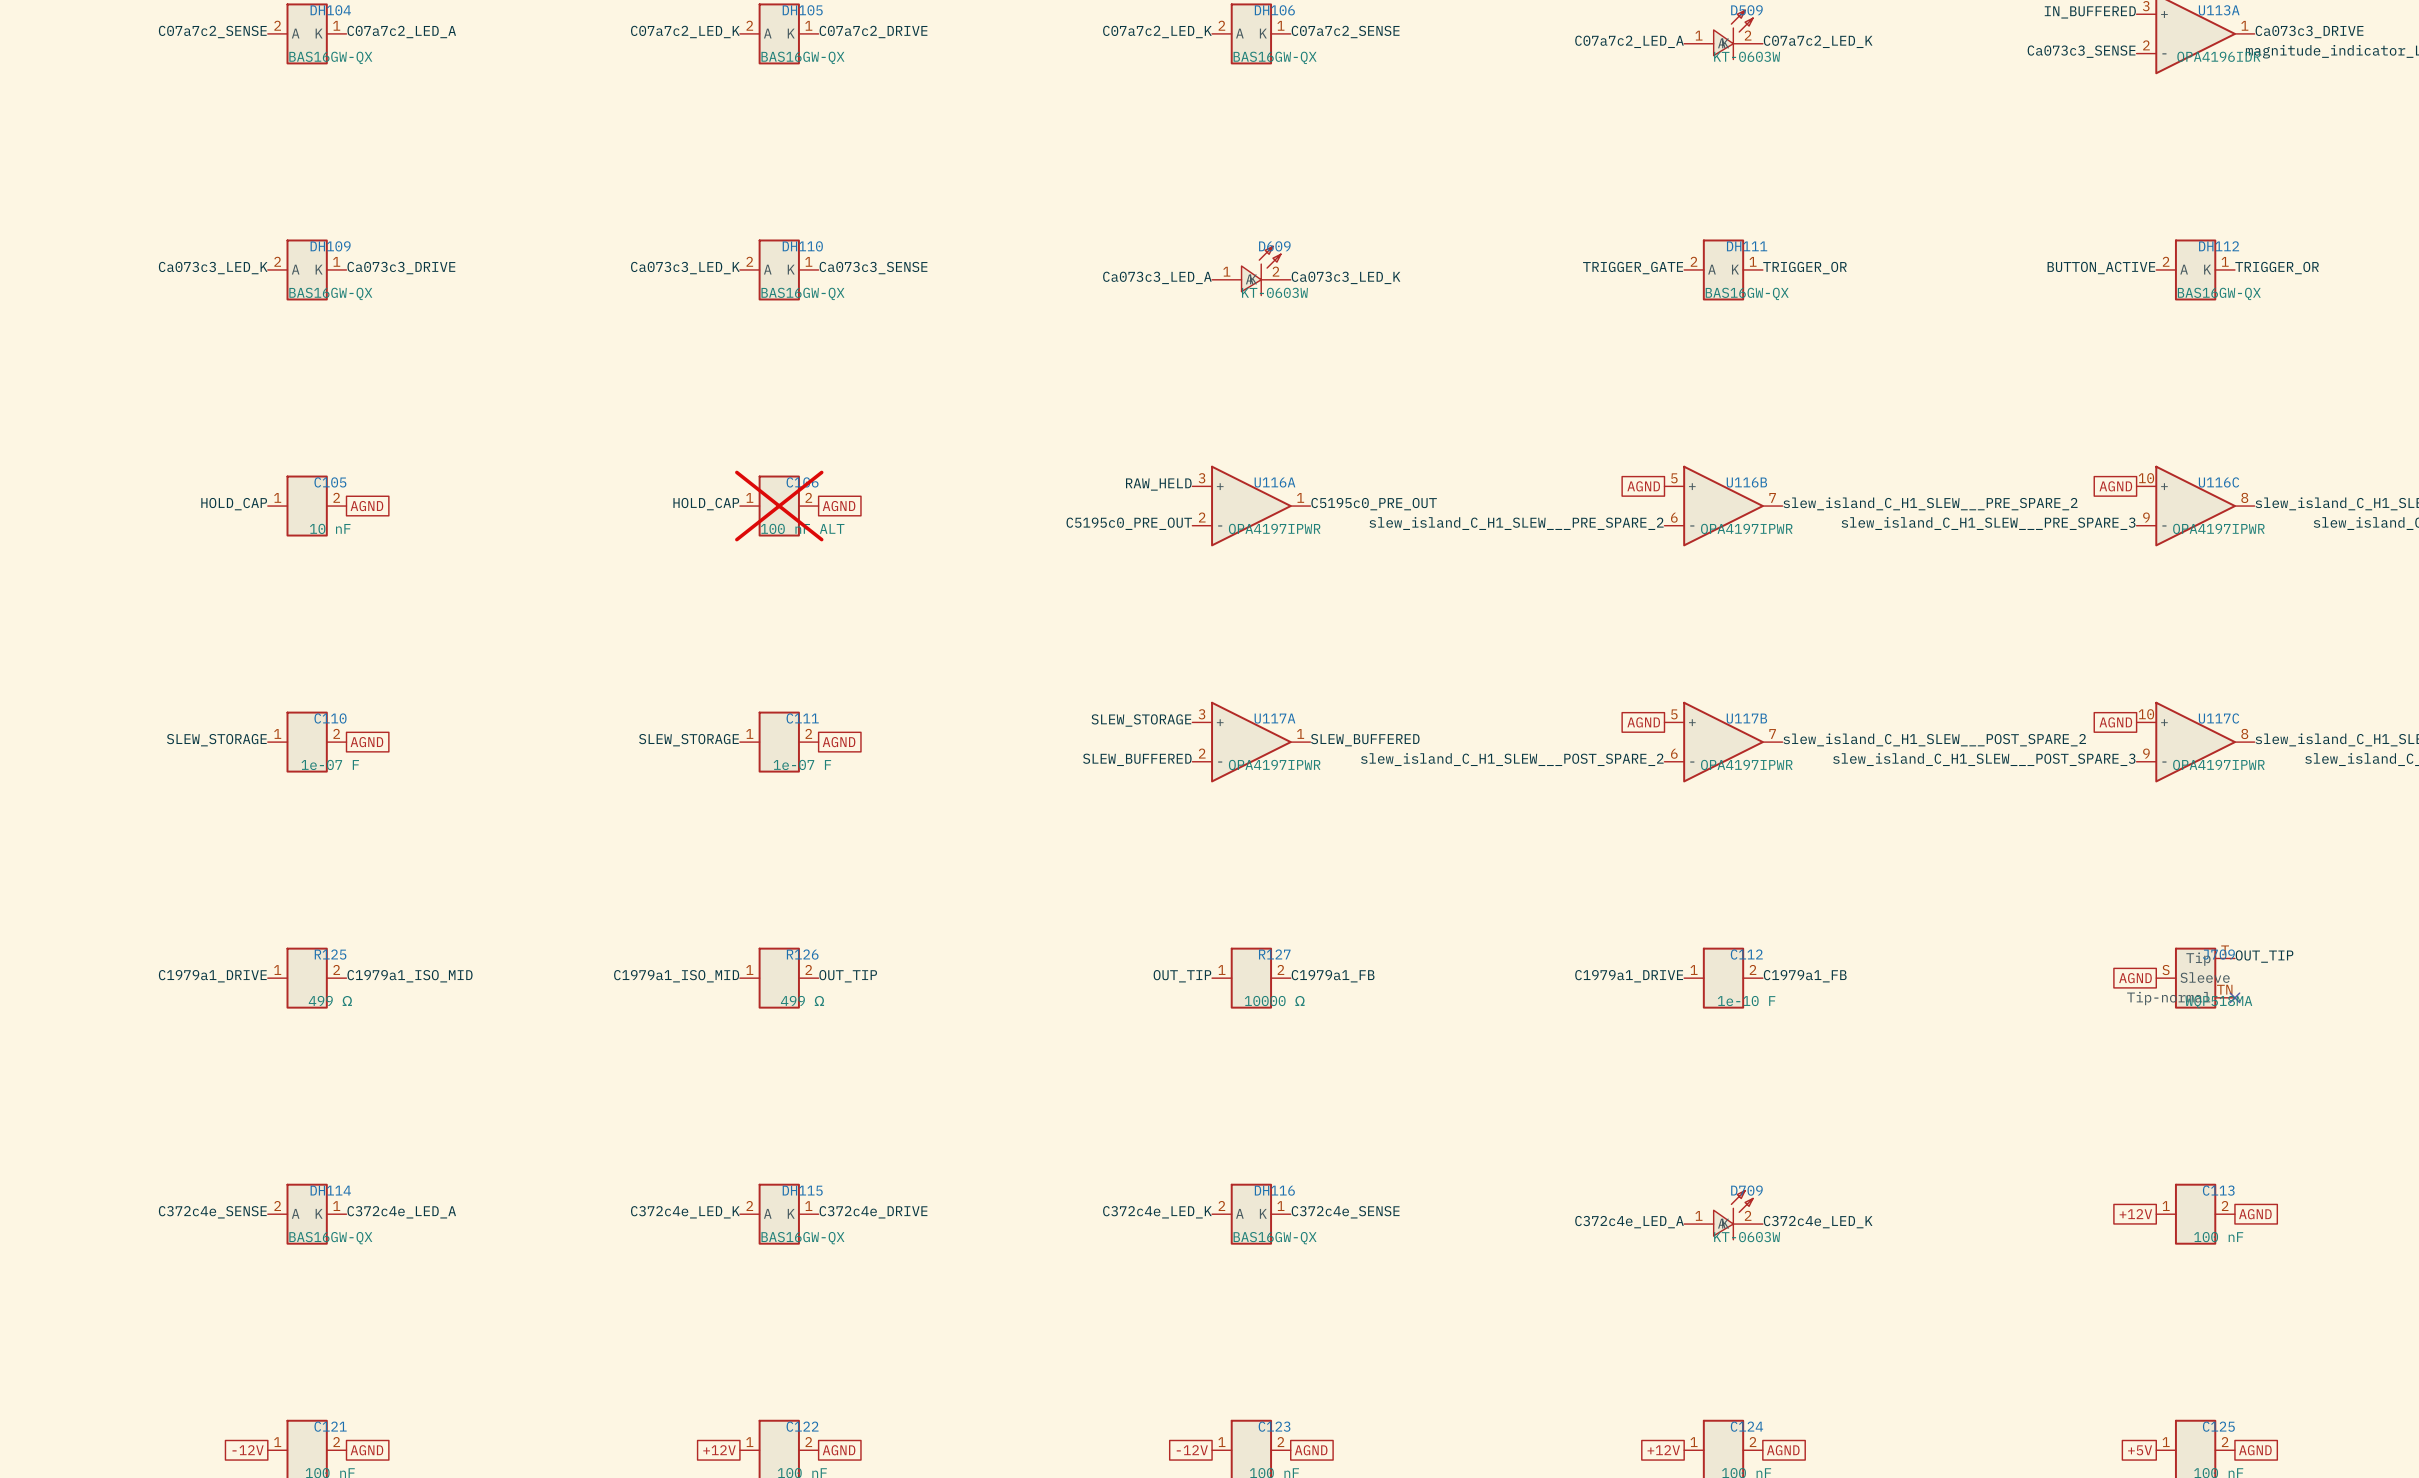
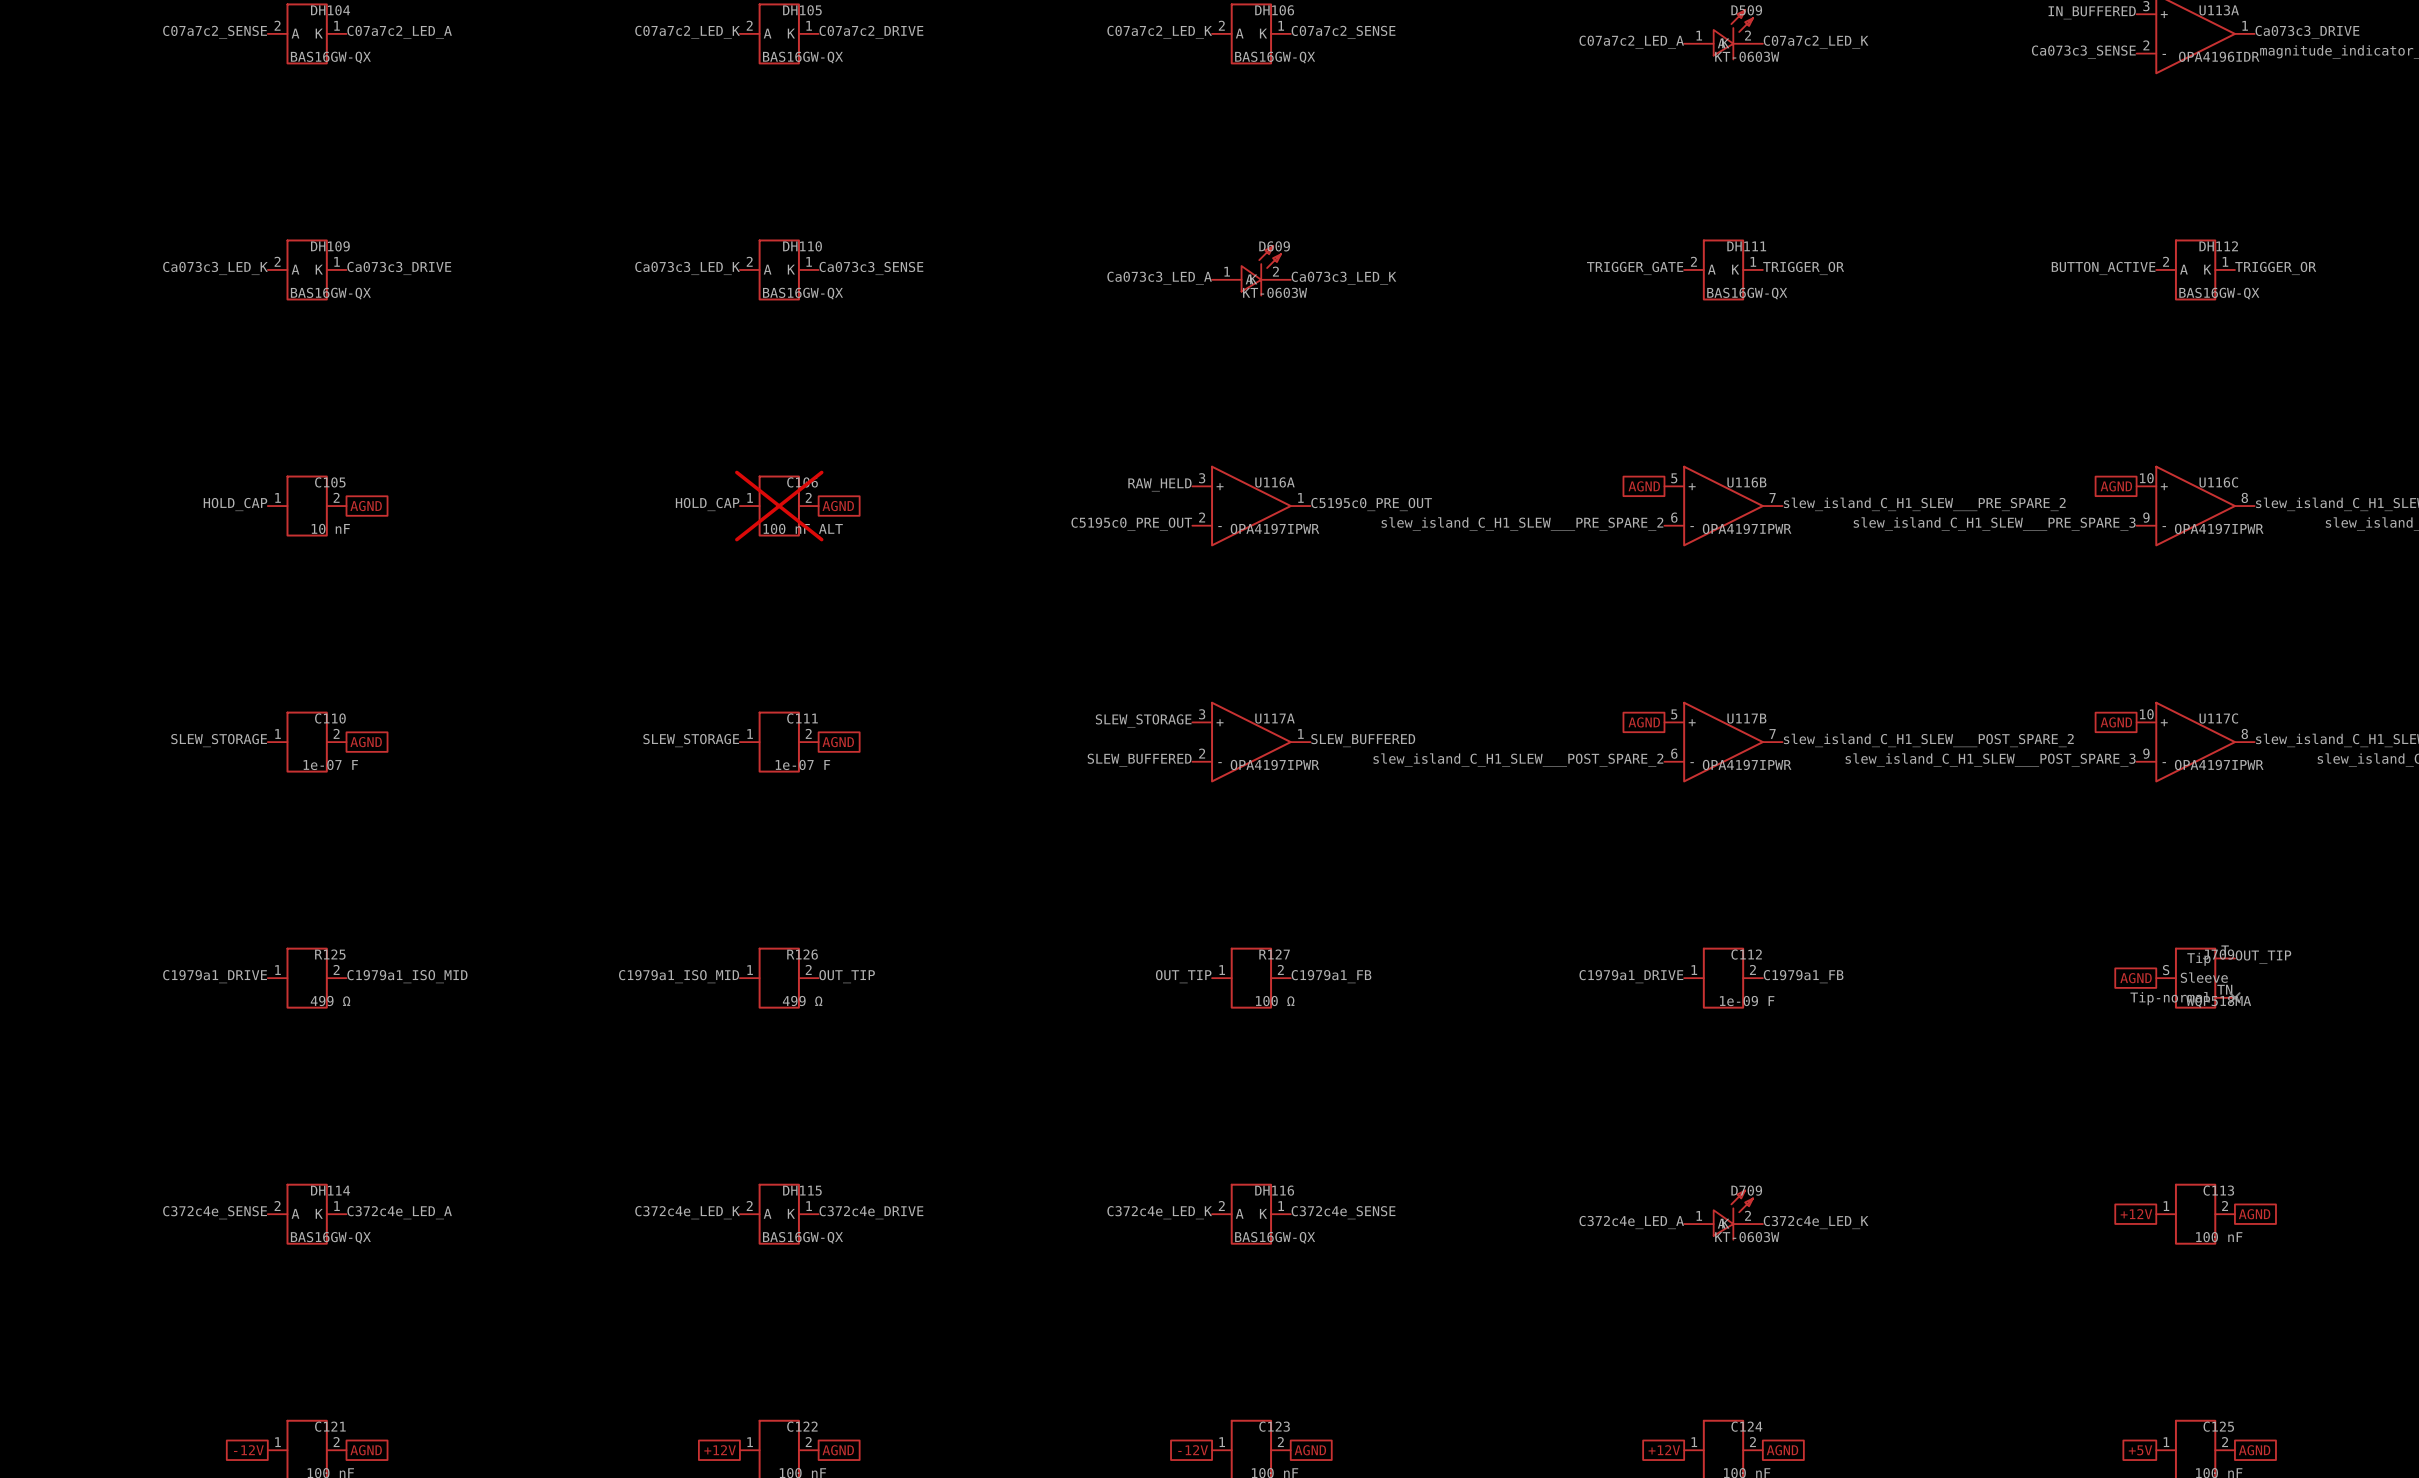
R127 value: 10000 Ω (1274, 1001) -> 100 Ω (1275, 1001)
C112 value: 1e-10 F (1746, 1001) -> 1e-09 F (1747, 1001)

